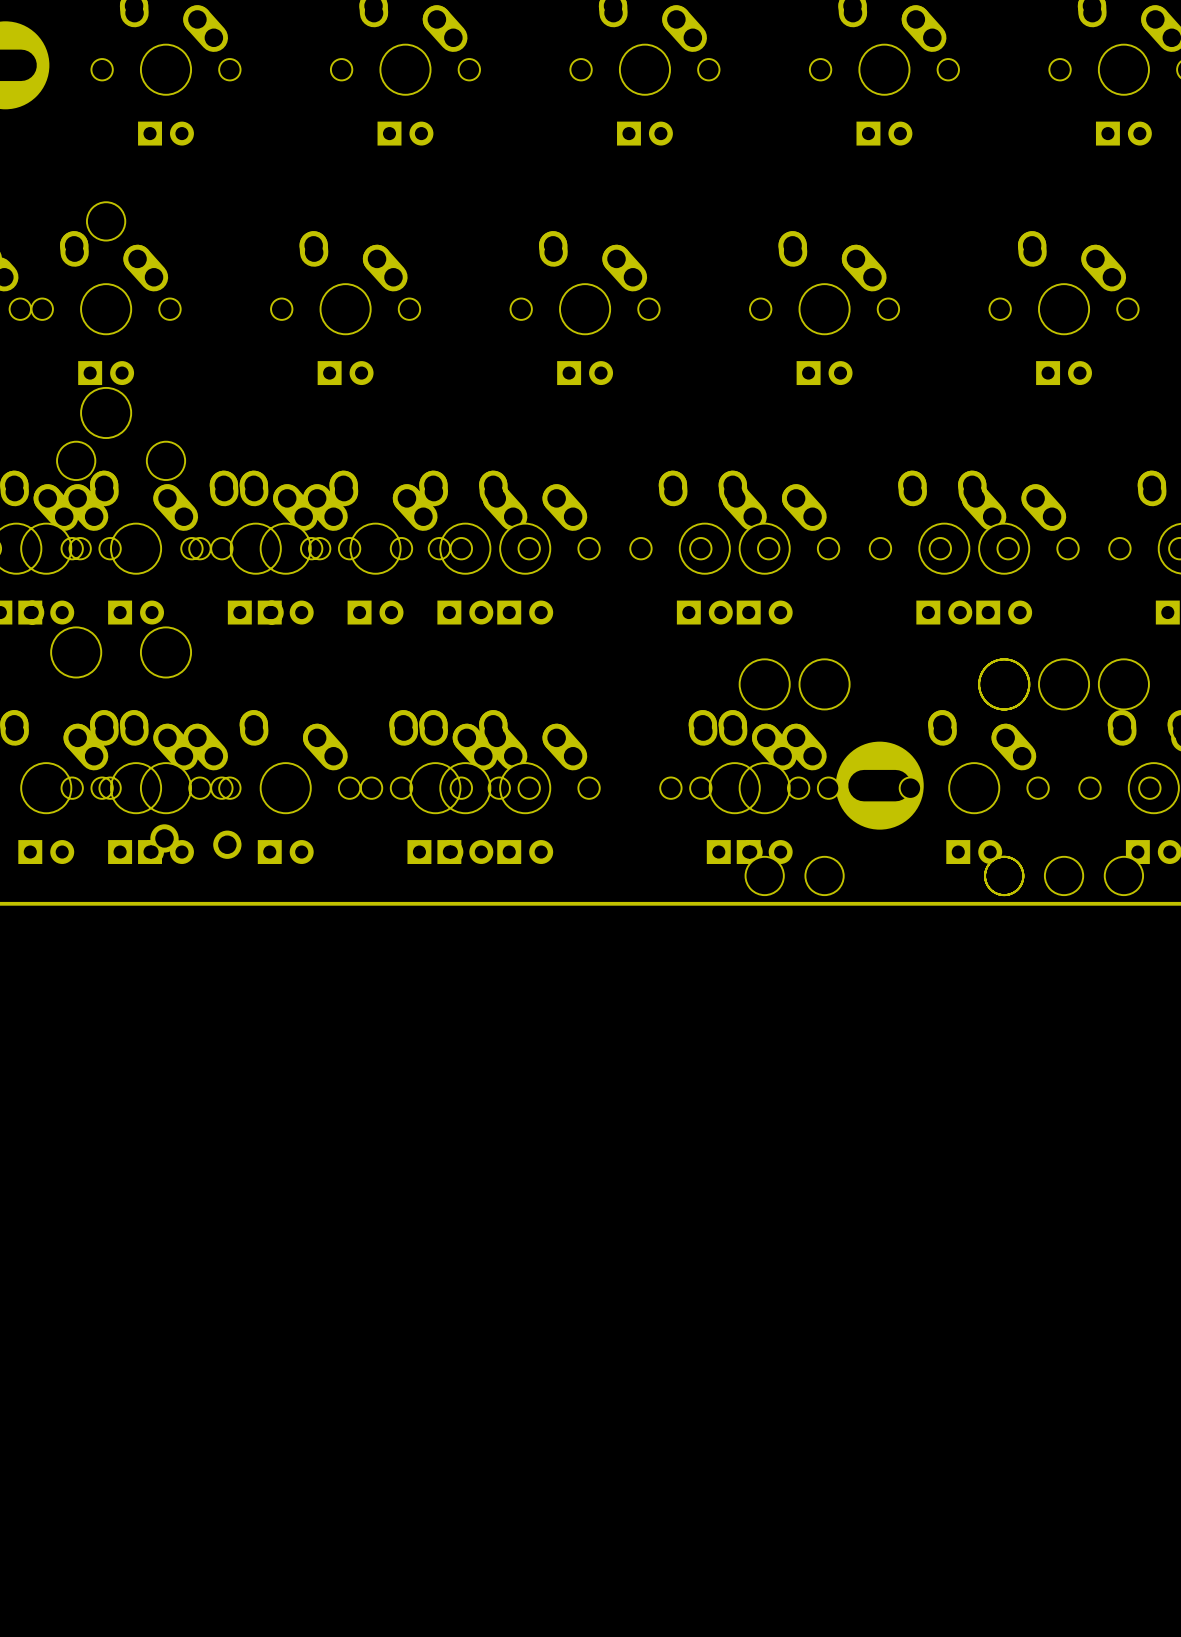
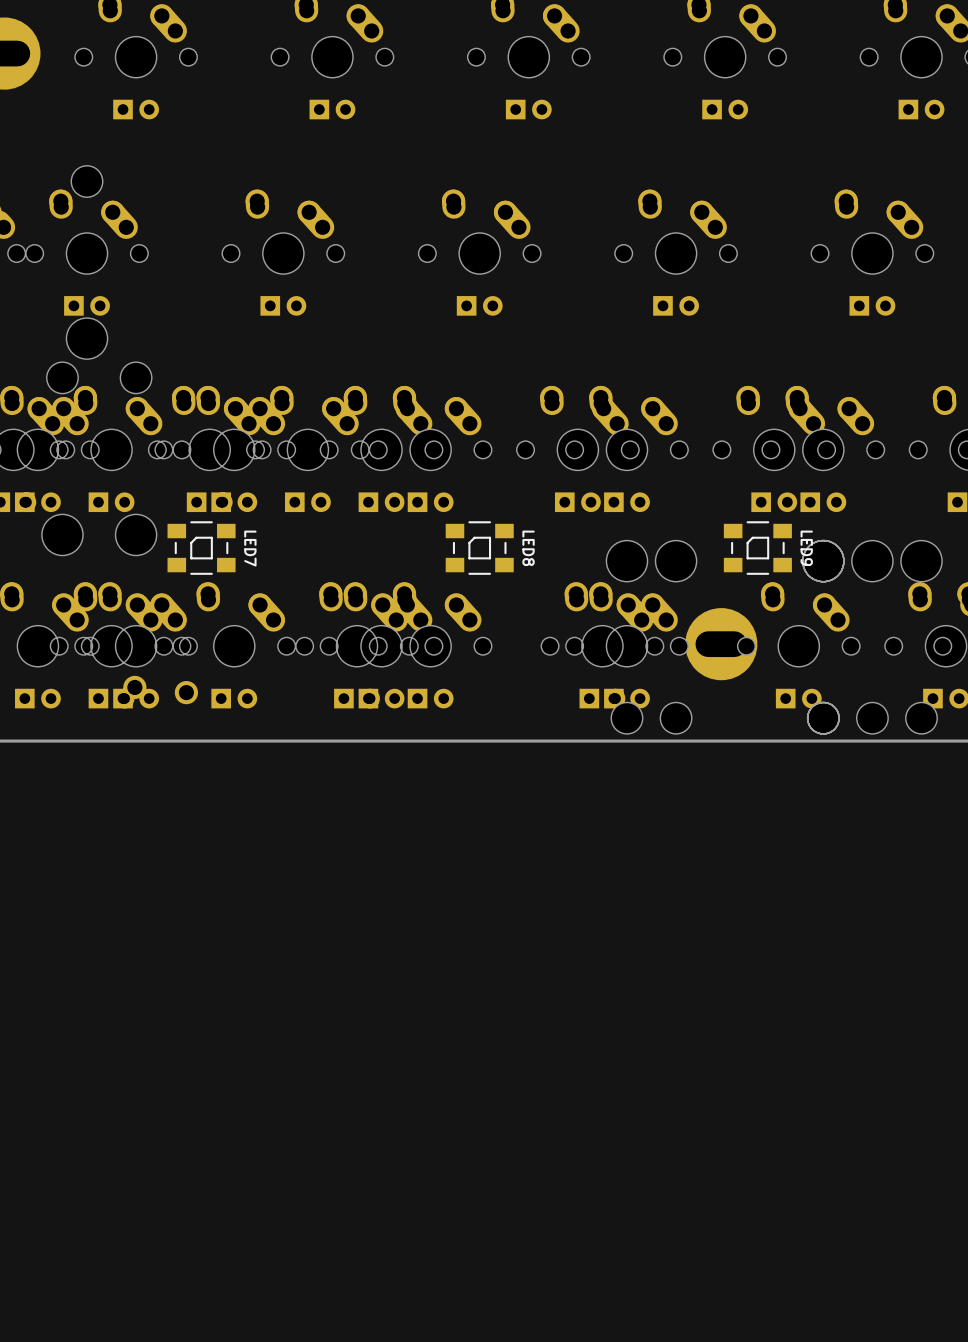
LED7: none -> (201, 548)
LED8: none -> (479, 548)
LED9: none -> (757, 548)

